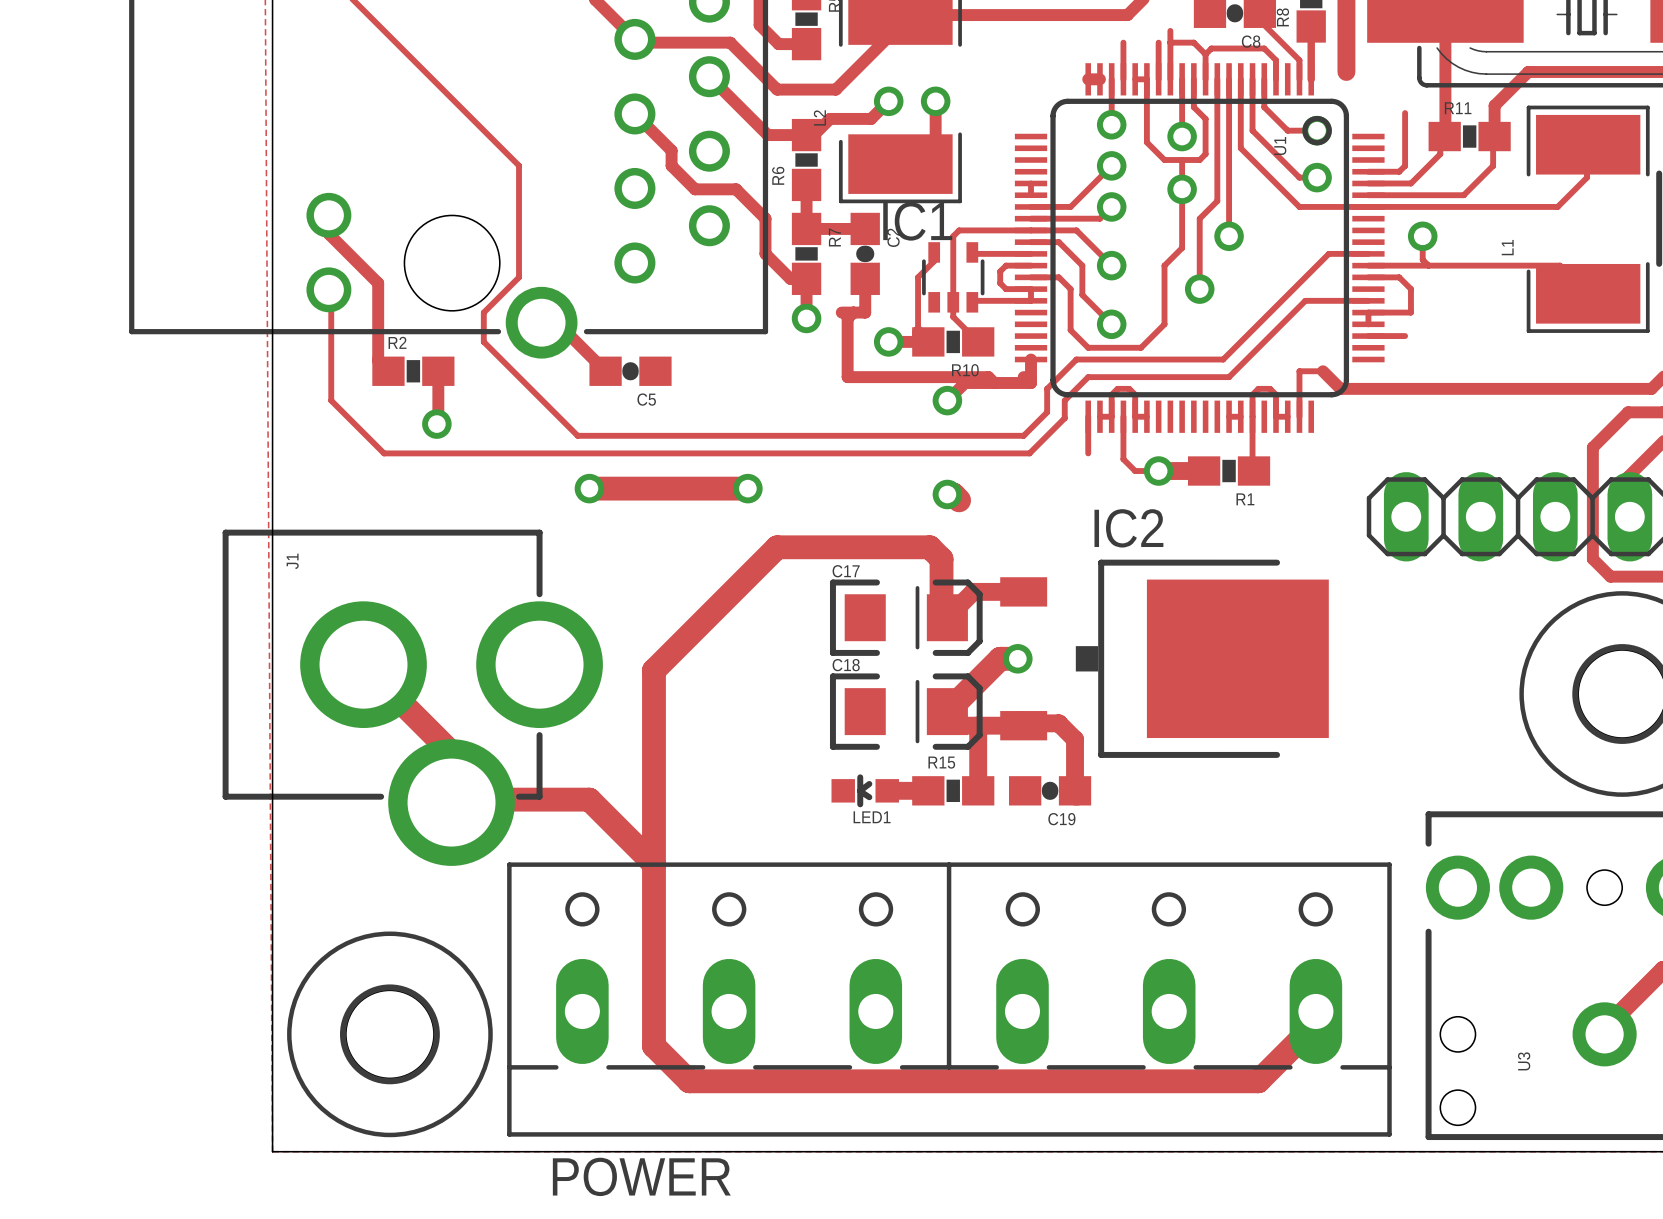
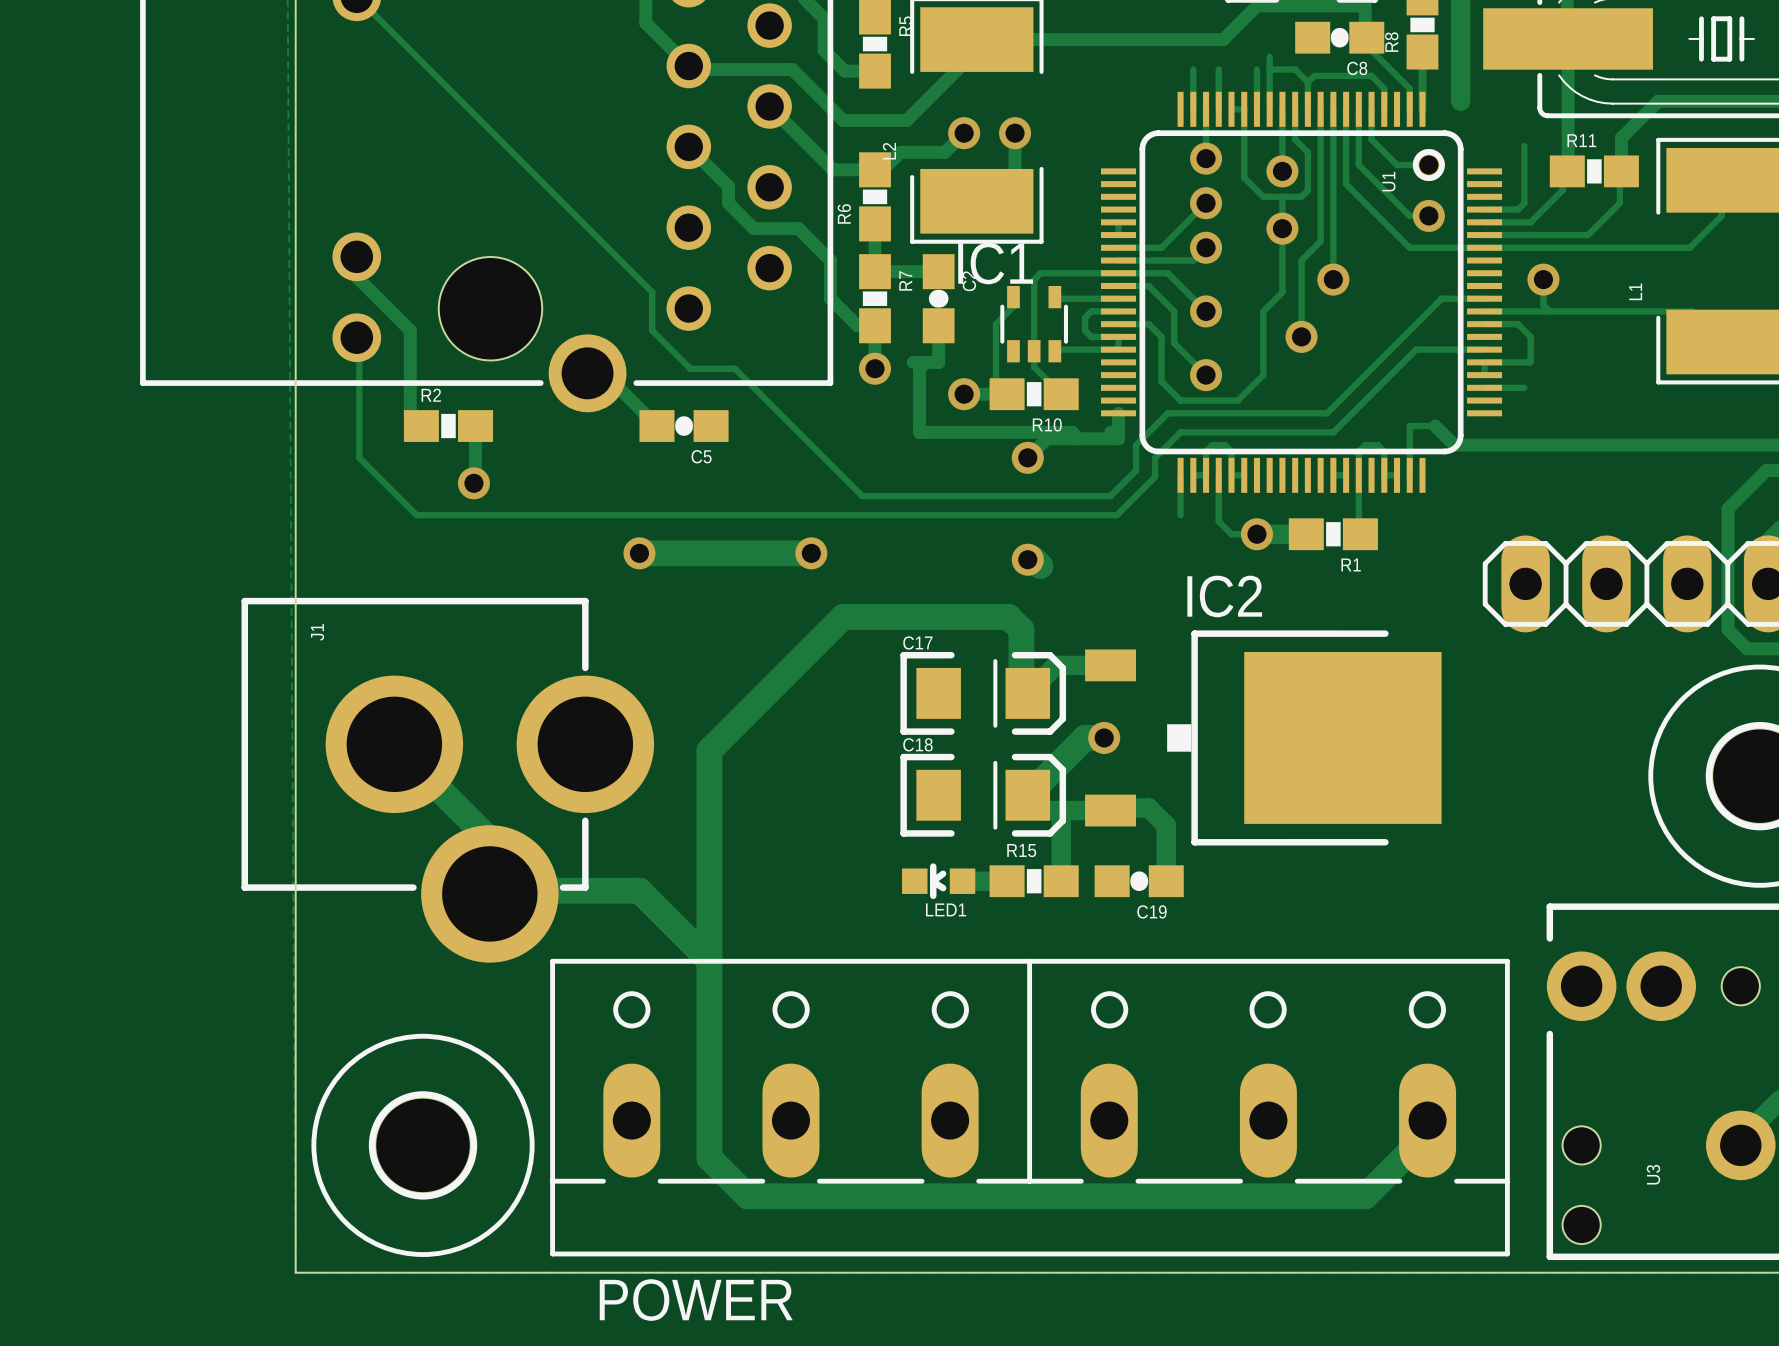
track: (1088, 79) (1099, 79) -> (1193, 69) (1193, 109)
track: (519, 165) (519, 277) (483, 312) (483, 341) (577, 435) (794, 435) -> (563, 203) (652, 292) (652, 330) (690, 368) (734, 368) (862, 496)

